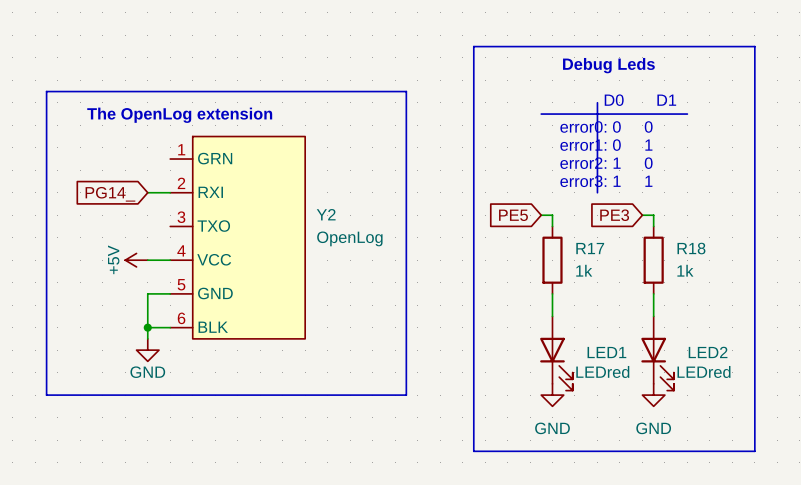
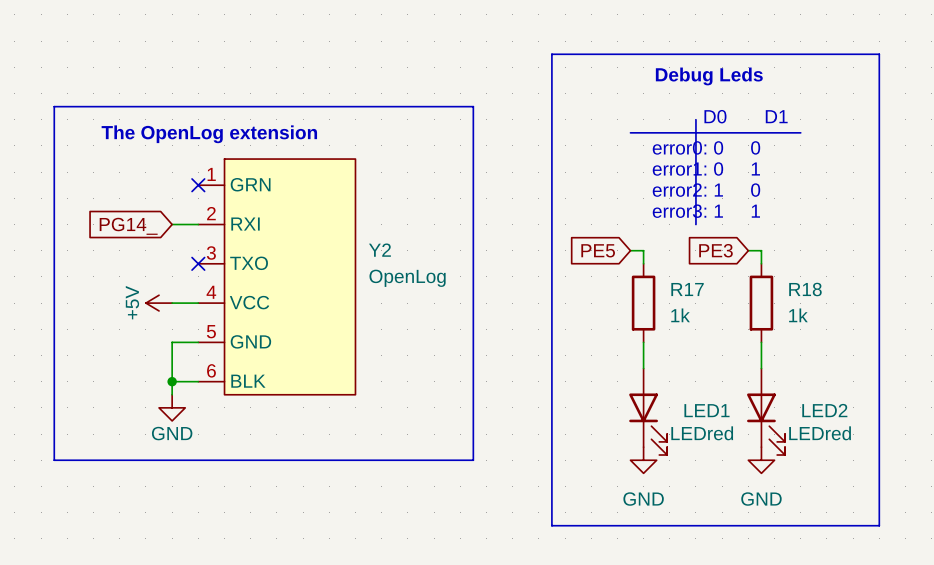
no-connect mark: none -> (198, 185)
no-connect mark: none -> (198, 263)

